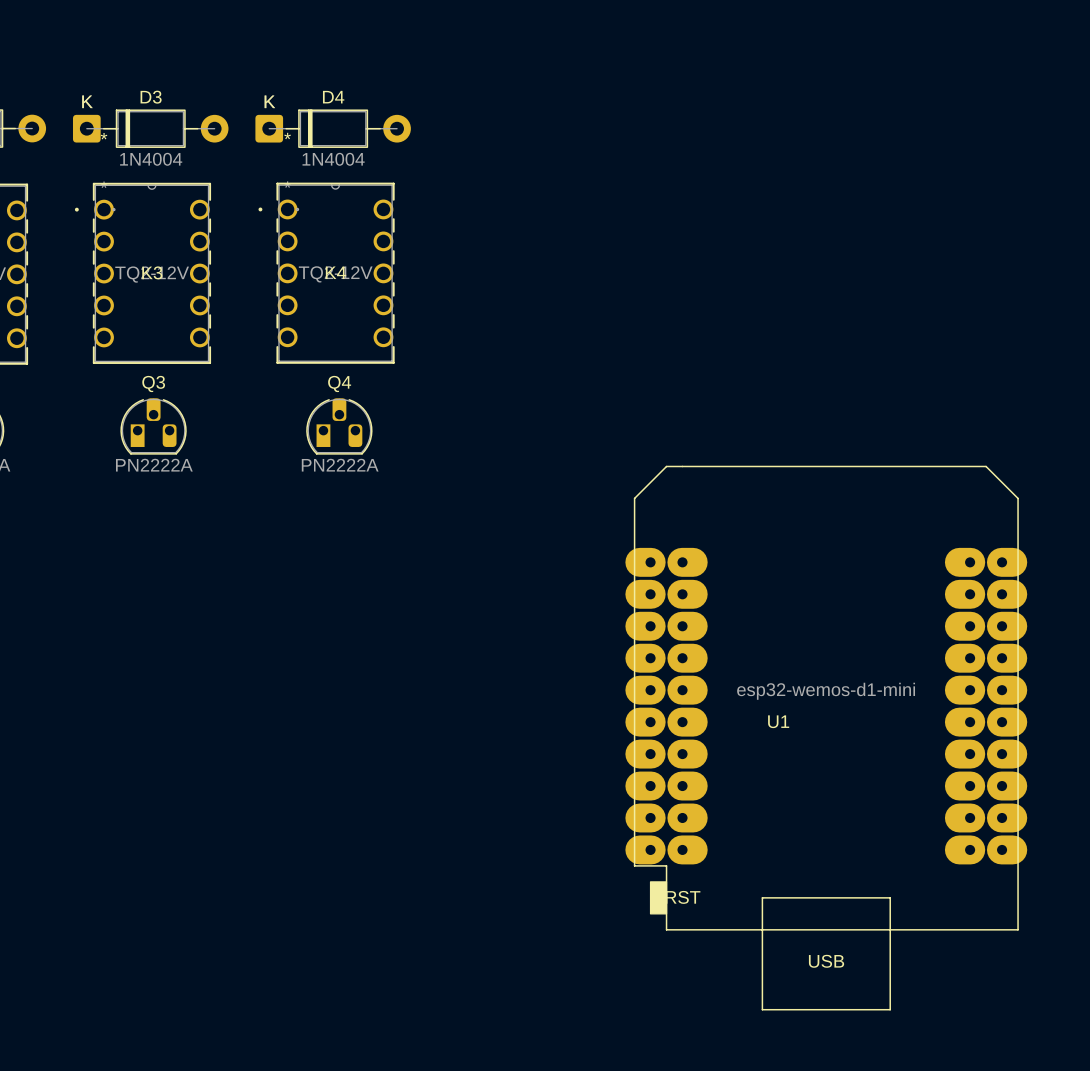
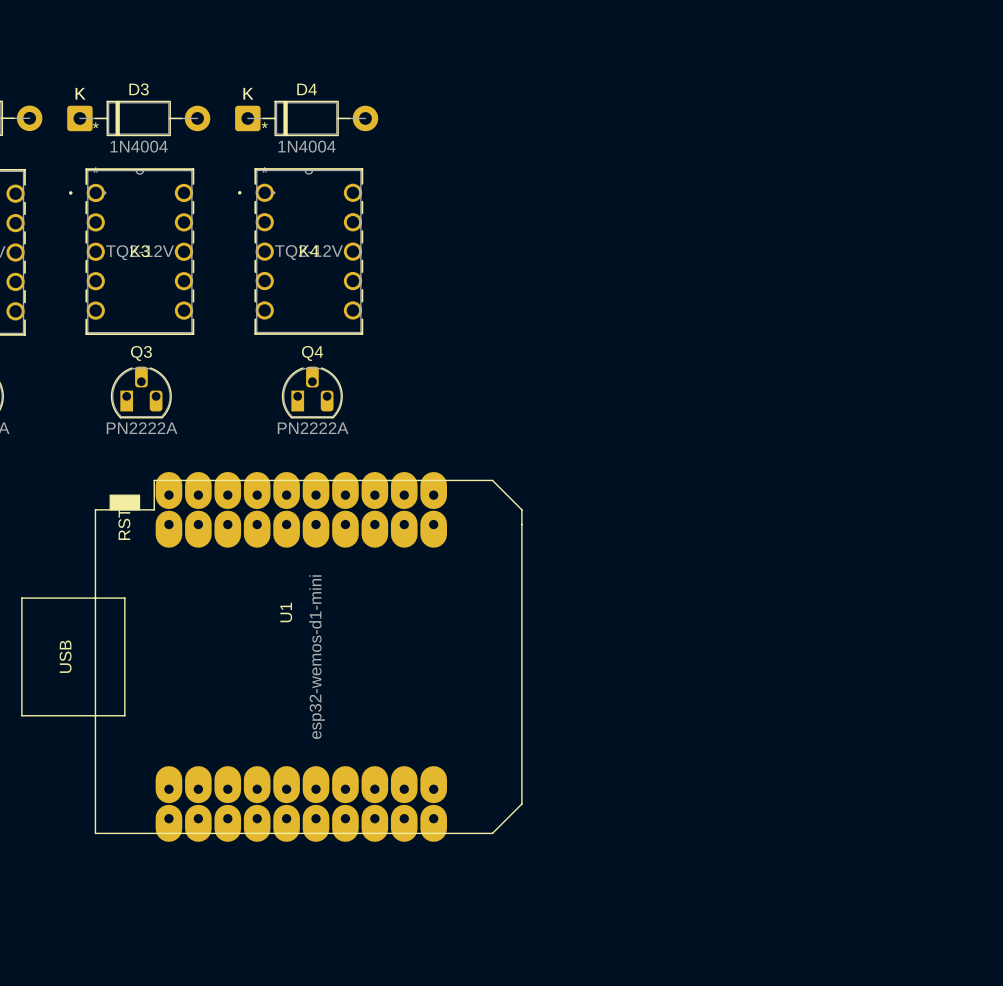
U1 rotation: 0° (826, 738) -> 90° clockwise (271, 656)
U1 position: (826, 738) -> (271, 656)

